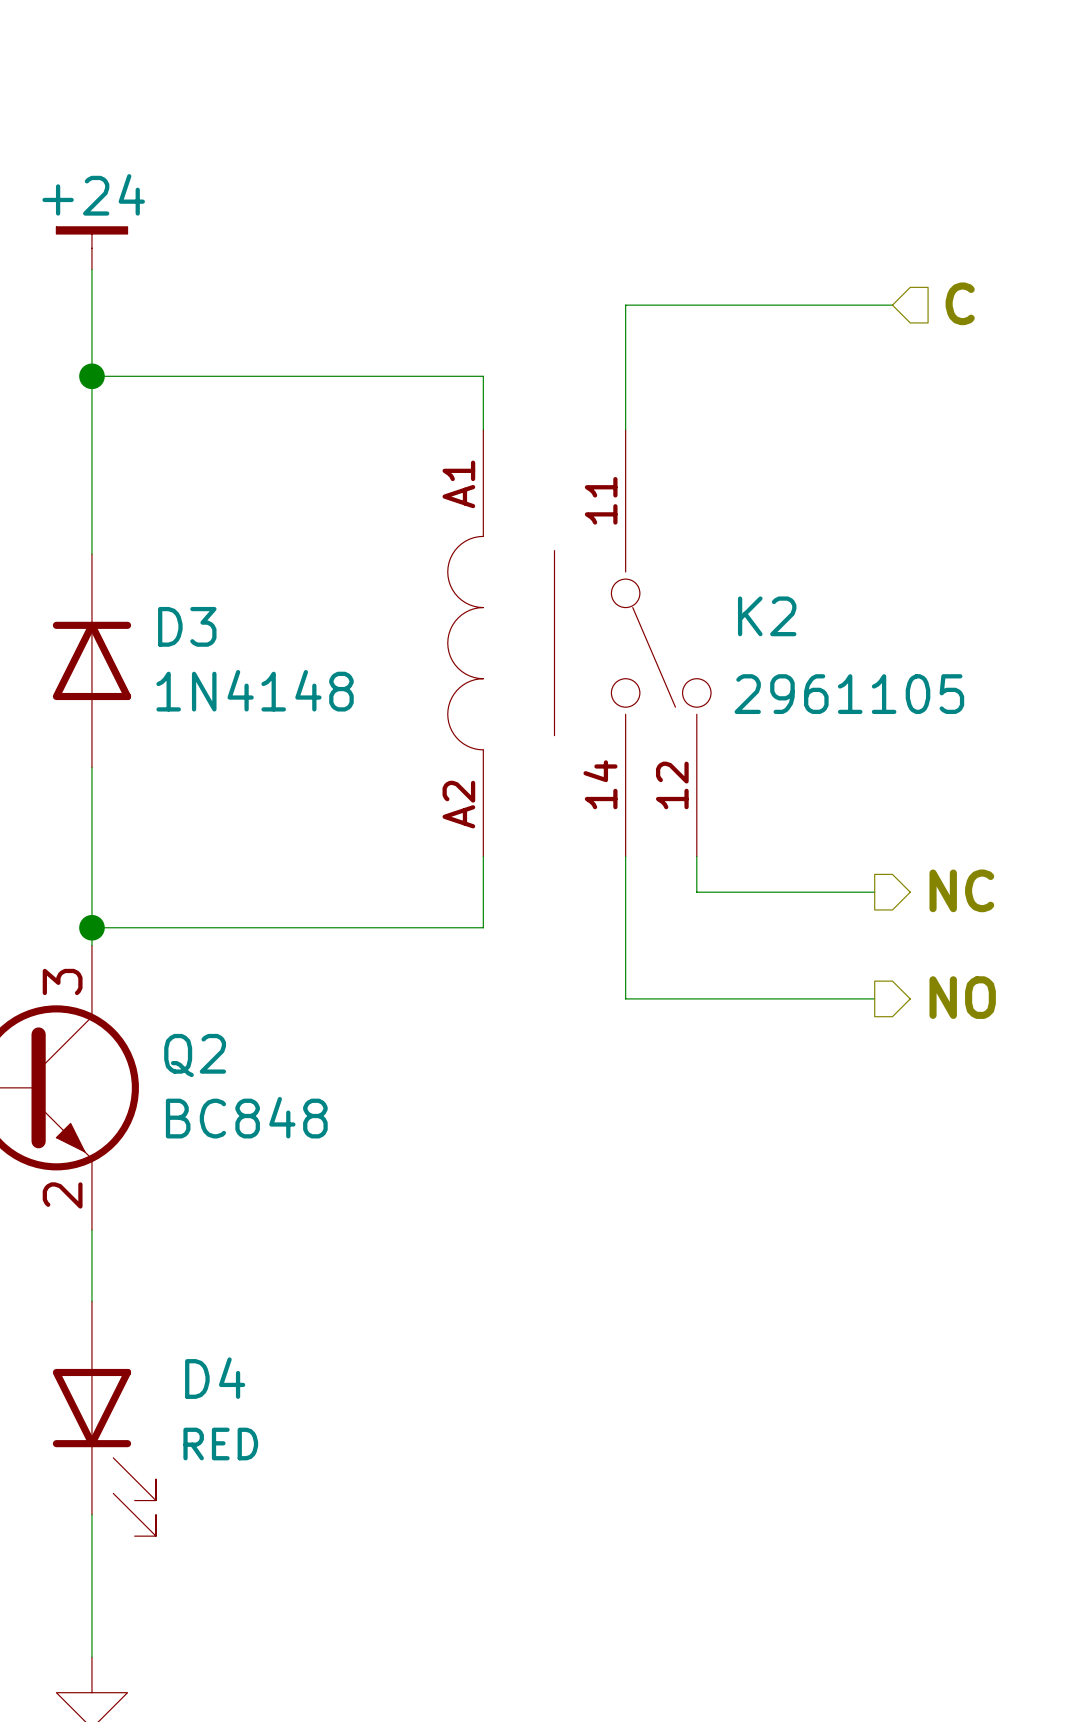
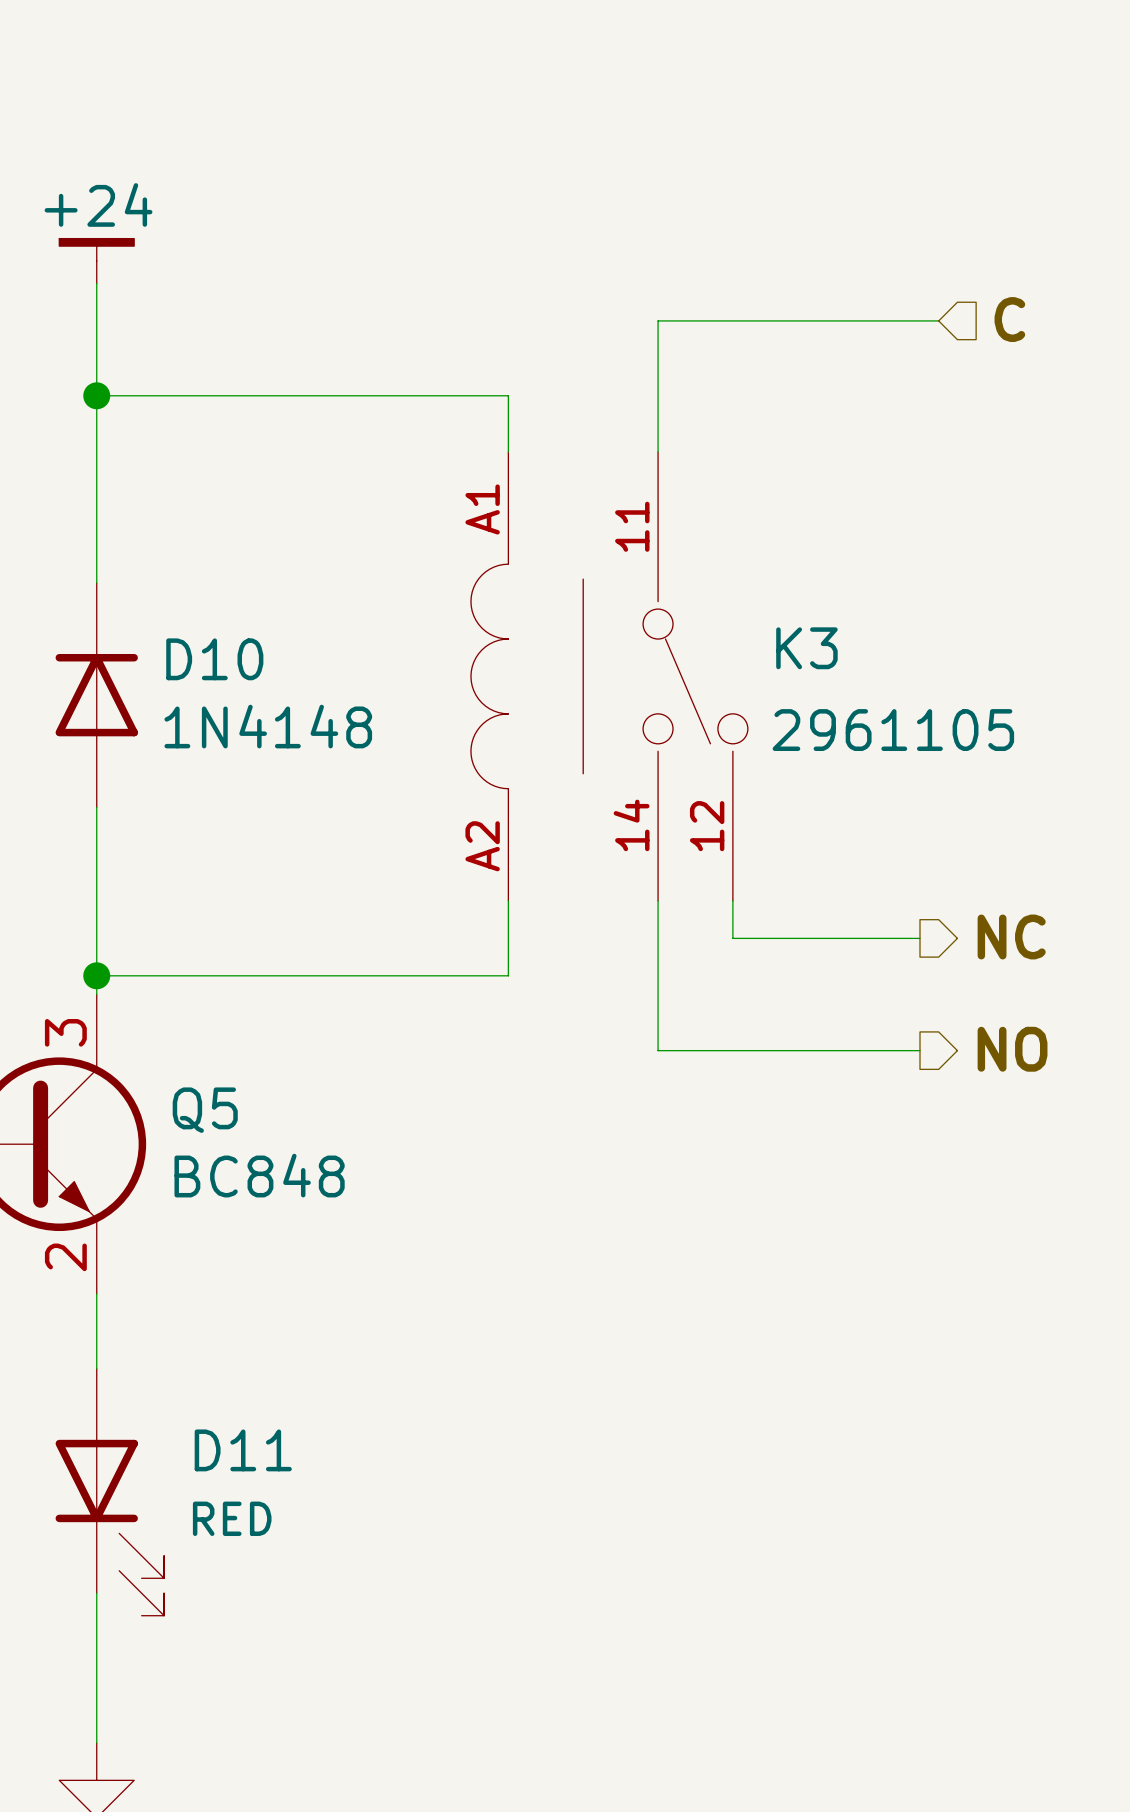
K2 name: K2 (767, 616) -> K3 (806, 648)
D3 name: D3 (187, 626) -> D10 (214, 659)
Q2 name: Q2 (195, 1055) -> Q5 (205, 1110)
D4 name: D4 (215, 1378) -> D11 (243, 1450)

